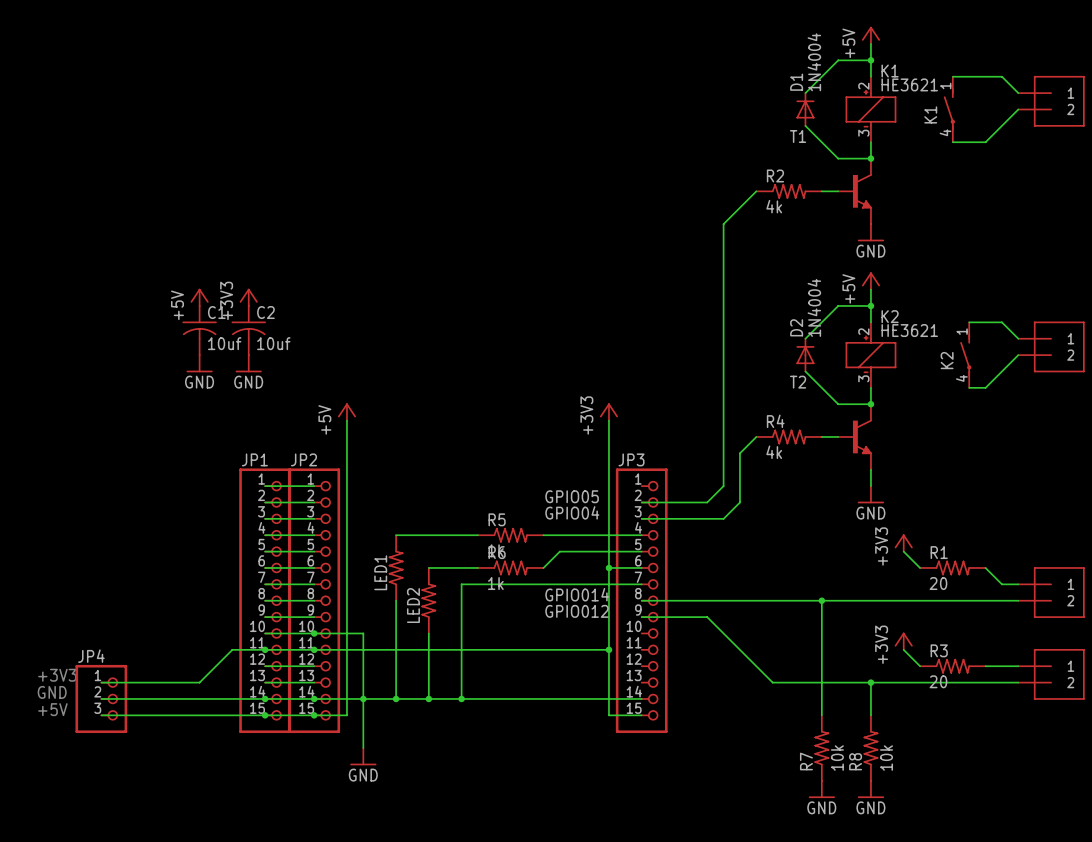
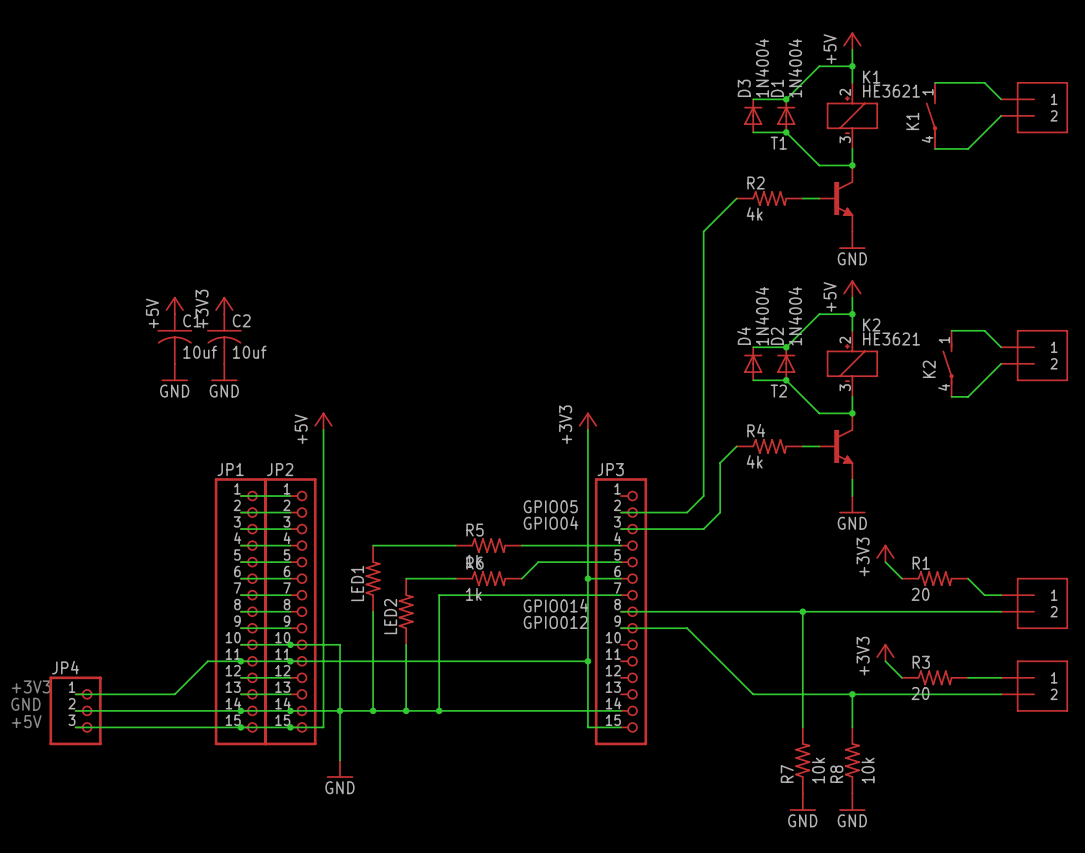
wire: none -> (753, 99) (786, 99)
junction: none -> (786, 99)
D3: none -> 1N4004 (753, 115)
wire: none -> (753, 132) (786, 132)
junction: none -> (786, 132)
wire: none -> (753, 347) (786, 347)
junction: none -> (786, 347)
D4: none -> 1N4004 (753, 363)
wire: none -> (753, 380) (786, 380)
junction: none -> (786, 380)

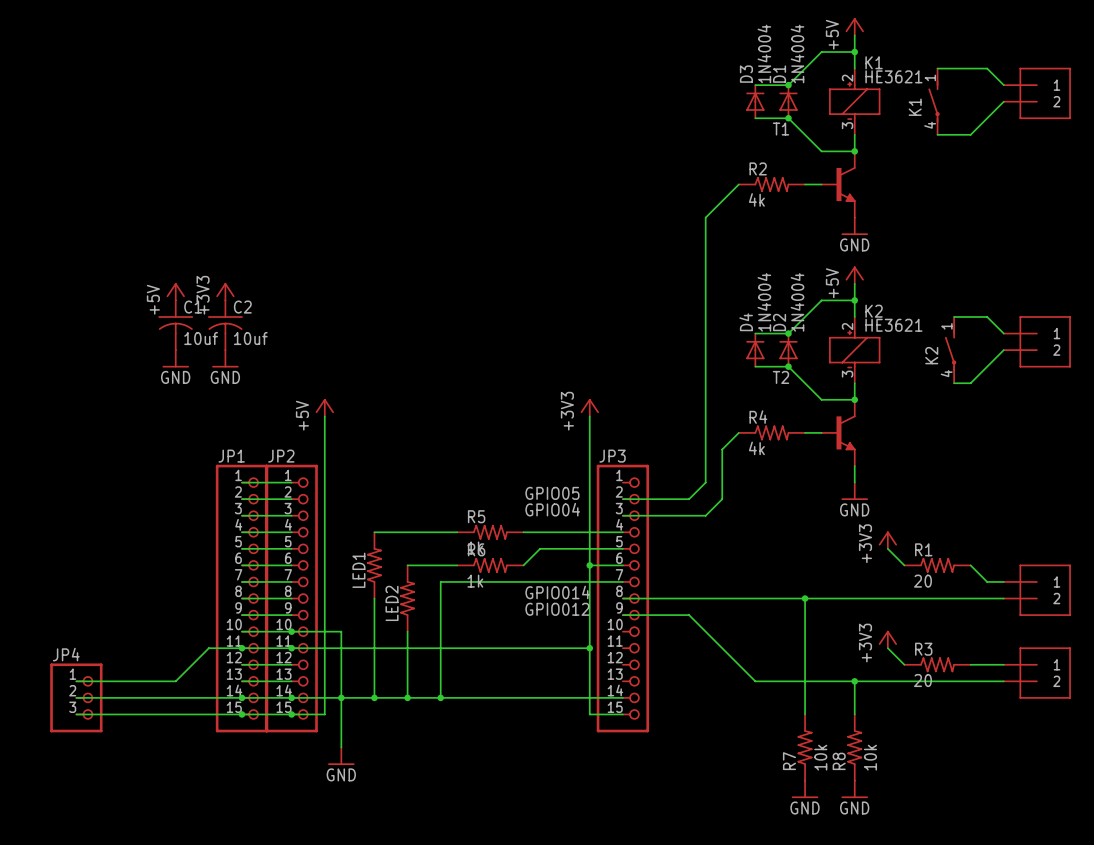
text: +3V3 (31, 686) -> none
text: GND (25, 704) -> none
text: +5V (26, 721) -> none

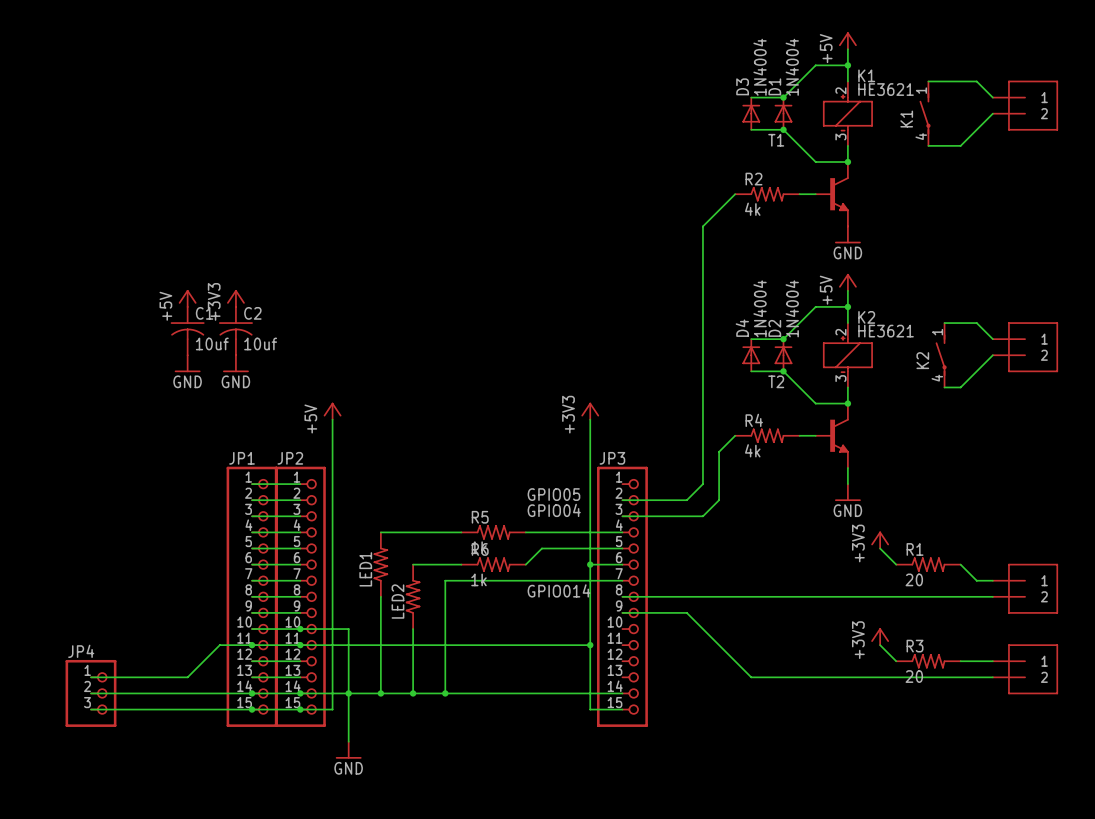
wire: (805, 598) (805, 714) -> none
junction: (805, 598) -> none
text: GPIO012 (557, 609) -> none
wire: (854, 681) (854, 714) -> none
junction: (854, 681) -> none
R7: 10k (805, 747) -> none
R8: 10k (854, 747) -> none
power symbol: GND (805, 789) -> none
power symbol: GND (854, 789) -> none

